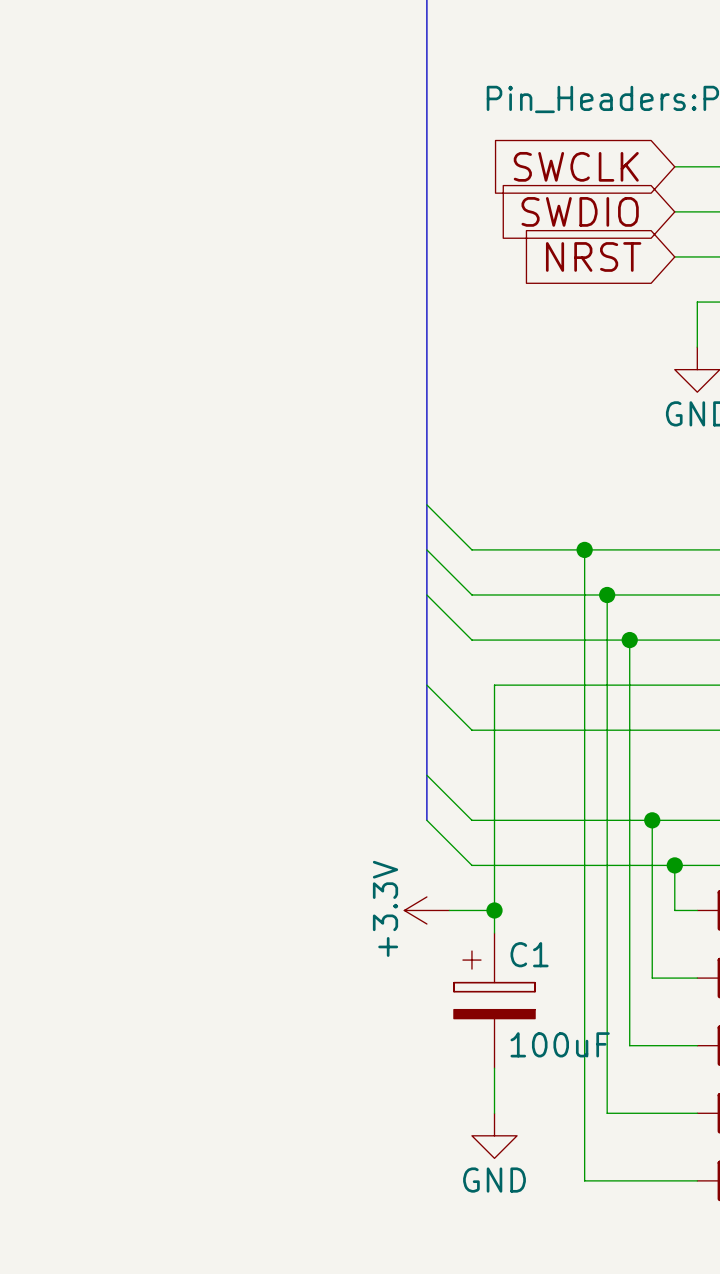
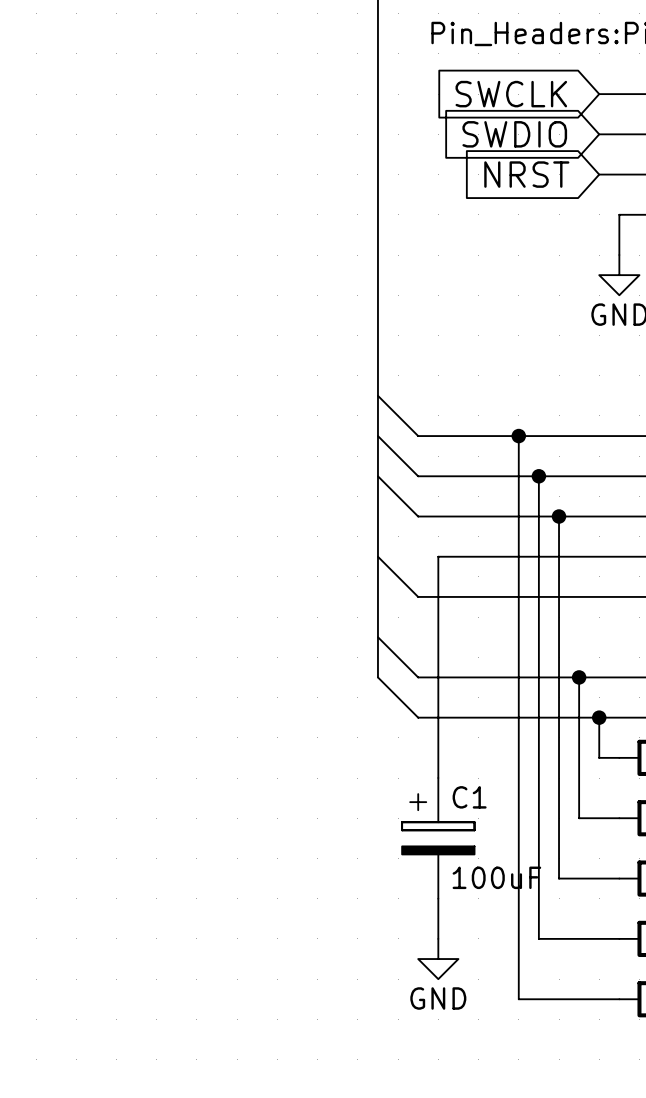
power symbol: +3.3V (426, 910) -> none
wire: (449, 910) (494, 910) -> none
junction: (494, 910) -> none

